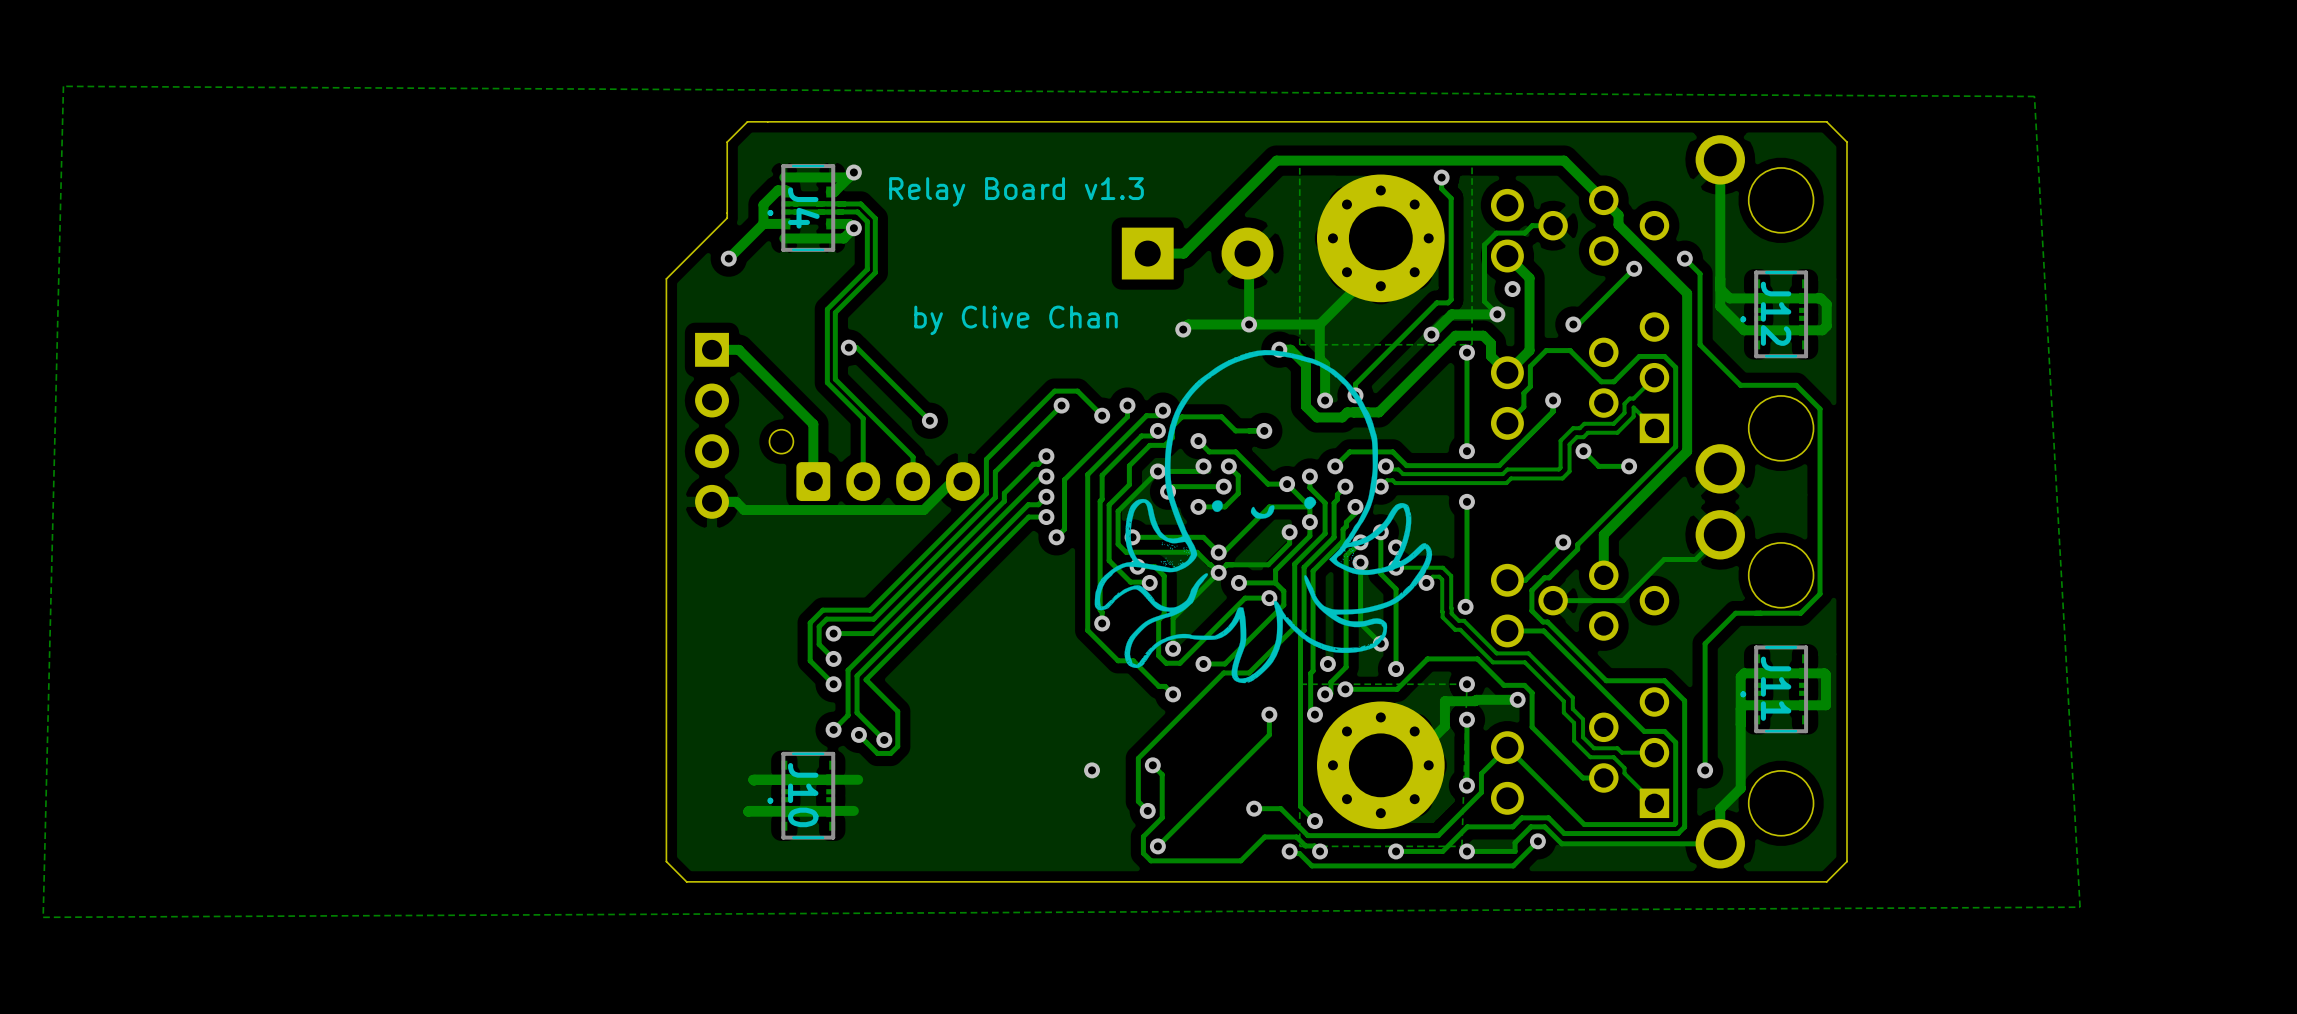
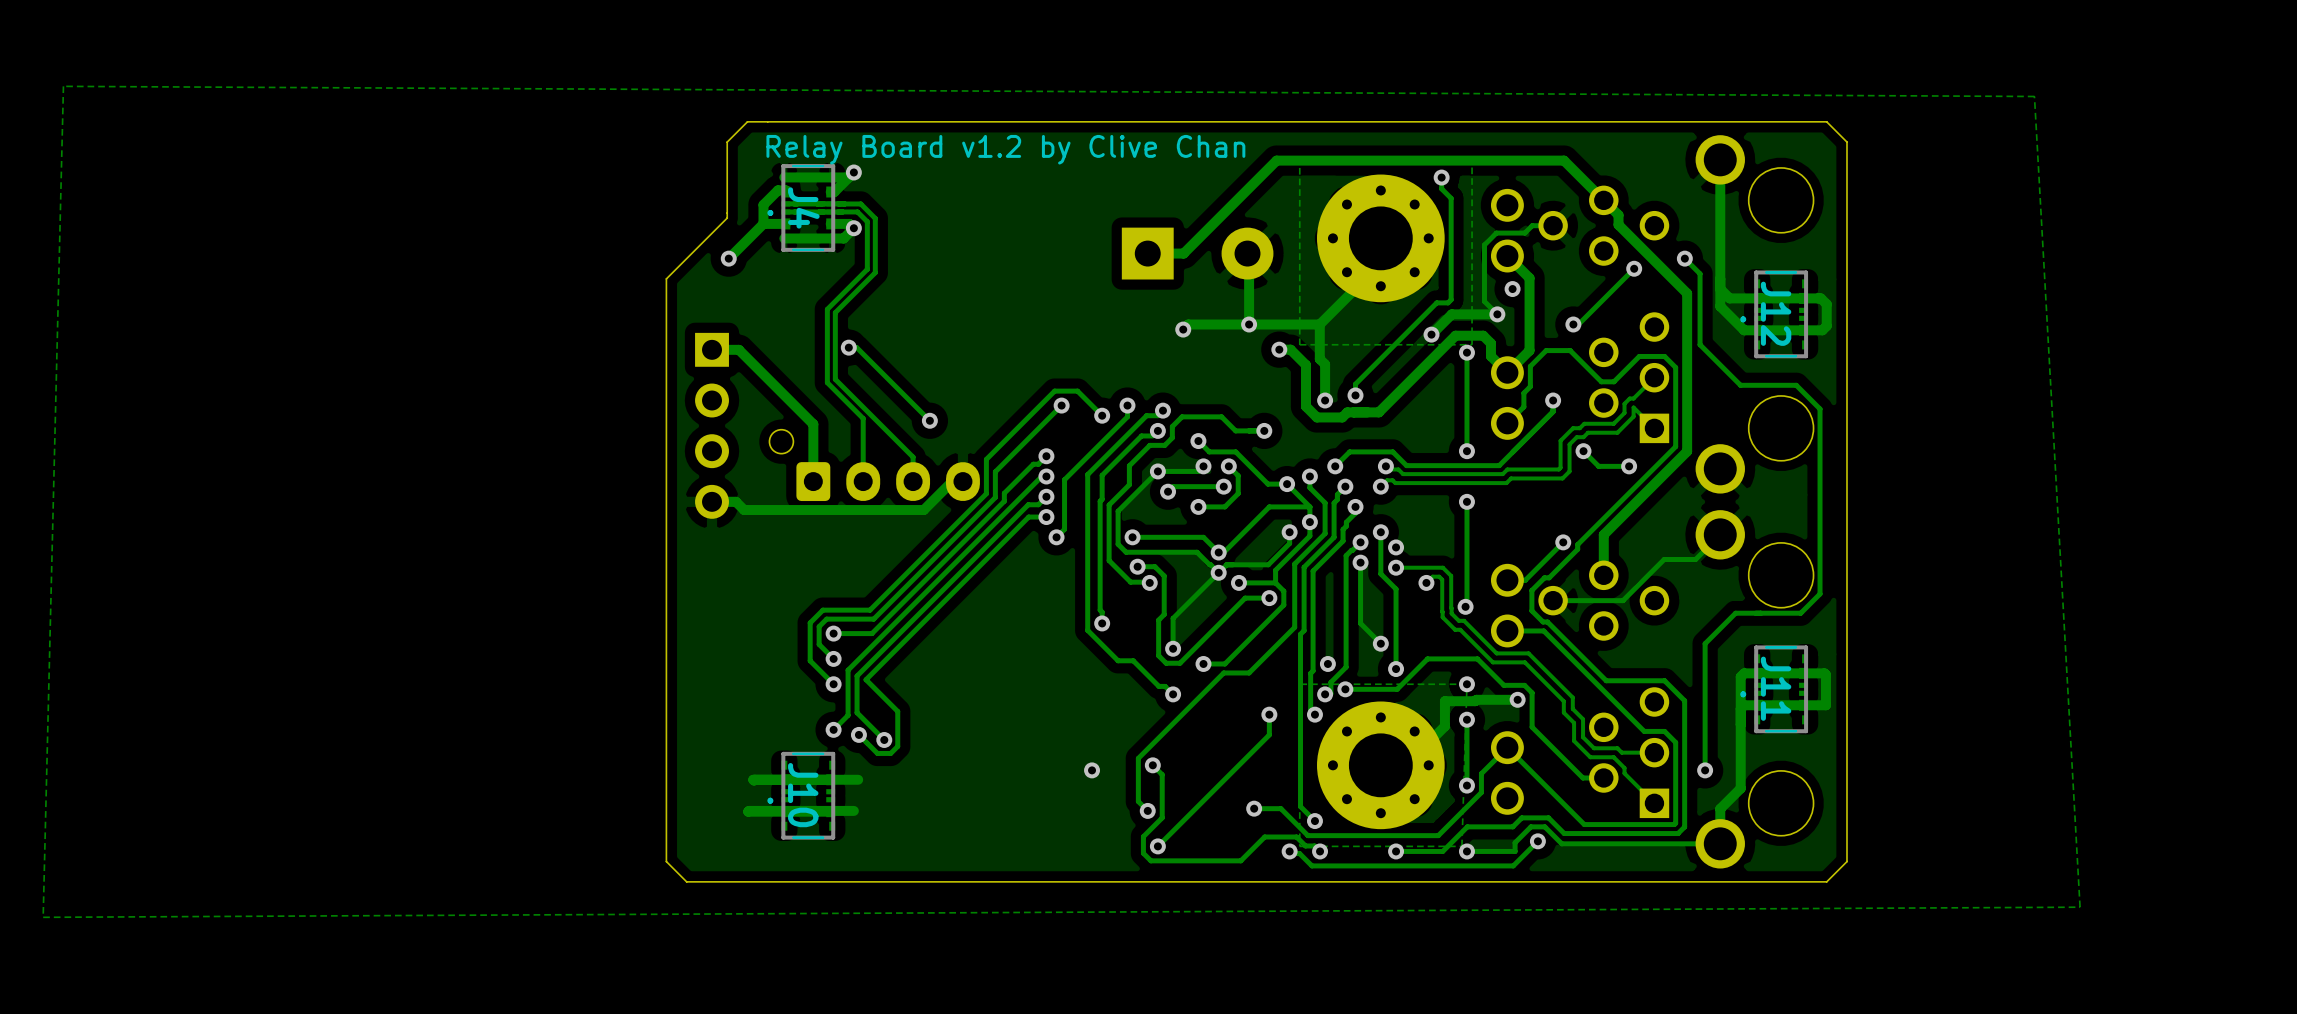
text: none -> Relay Board v1.2 by Clive Chan (1005, 149)
text: Relay Board v1.3 (1016, 191) -> none
text: by Clive Chan (1016, 320) -> none
drawing: [1094, 350, 1433, 684] -> none

